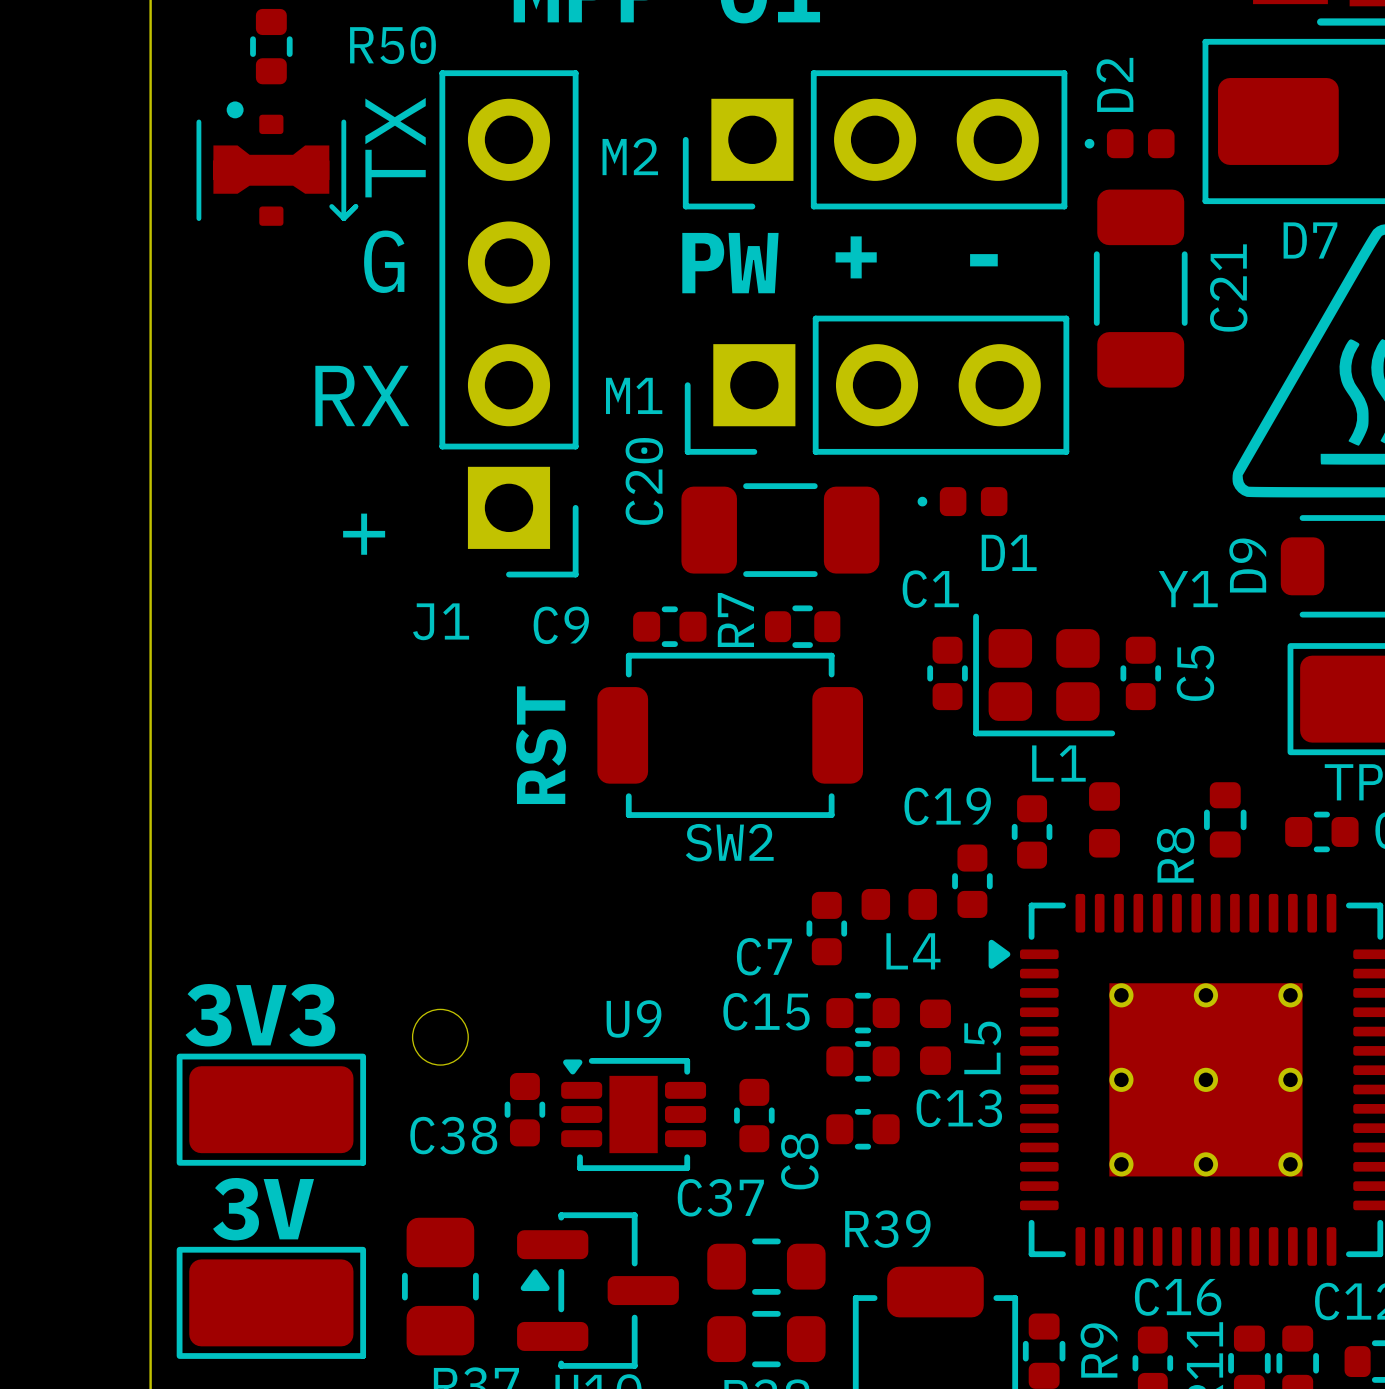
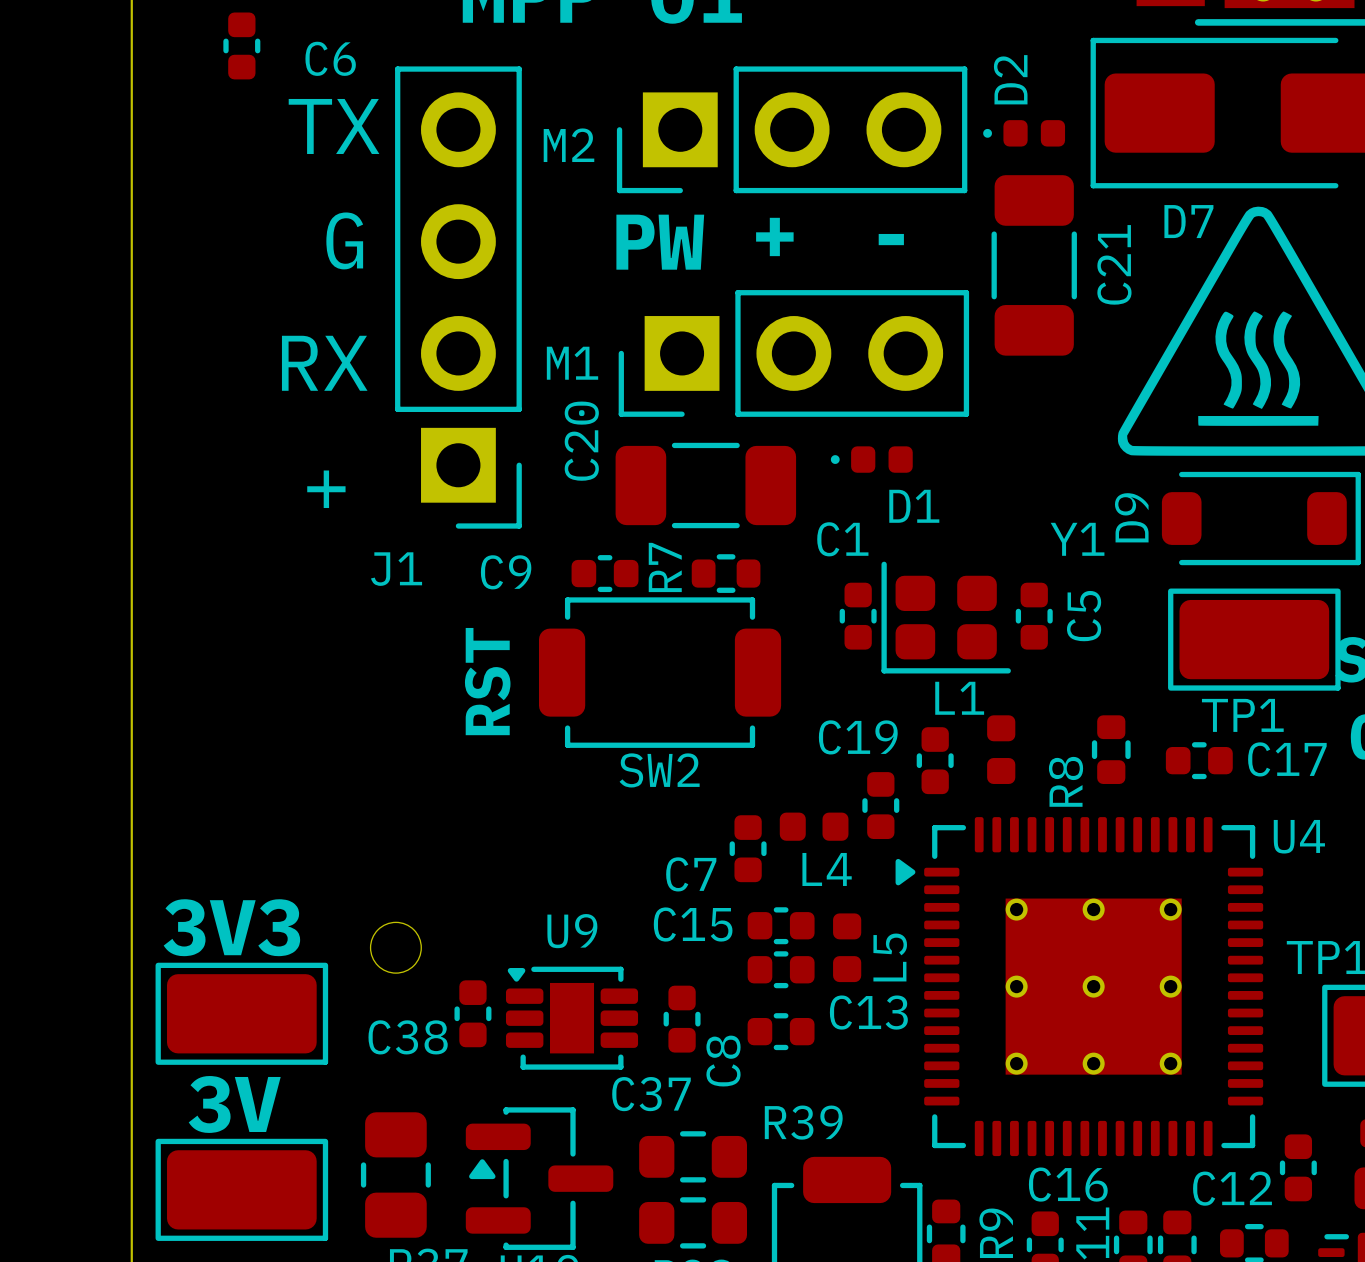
R50: (271, 46) -> none
C6: none -> (241, 45)
text rotation: 0° (395, 147) -> 90° clockwise (334, 126)
part: (277, 163) -> none

